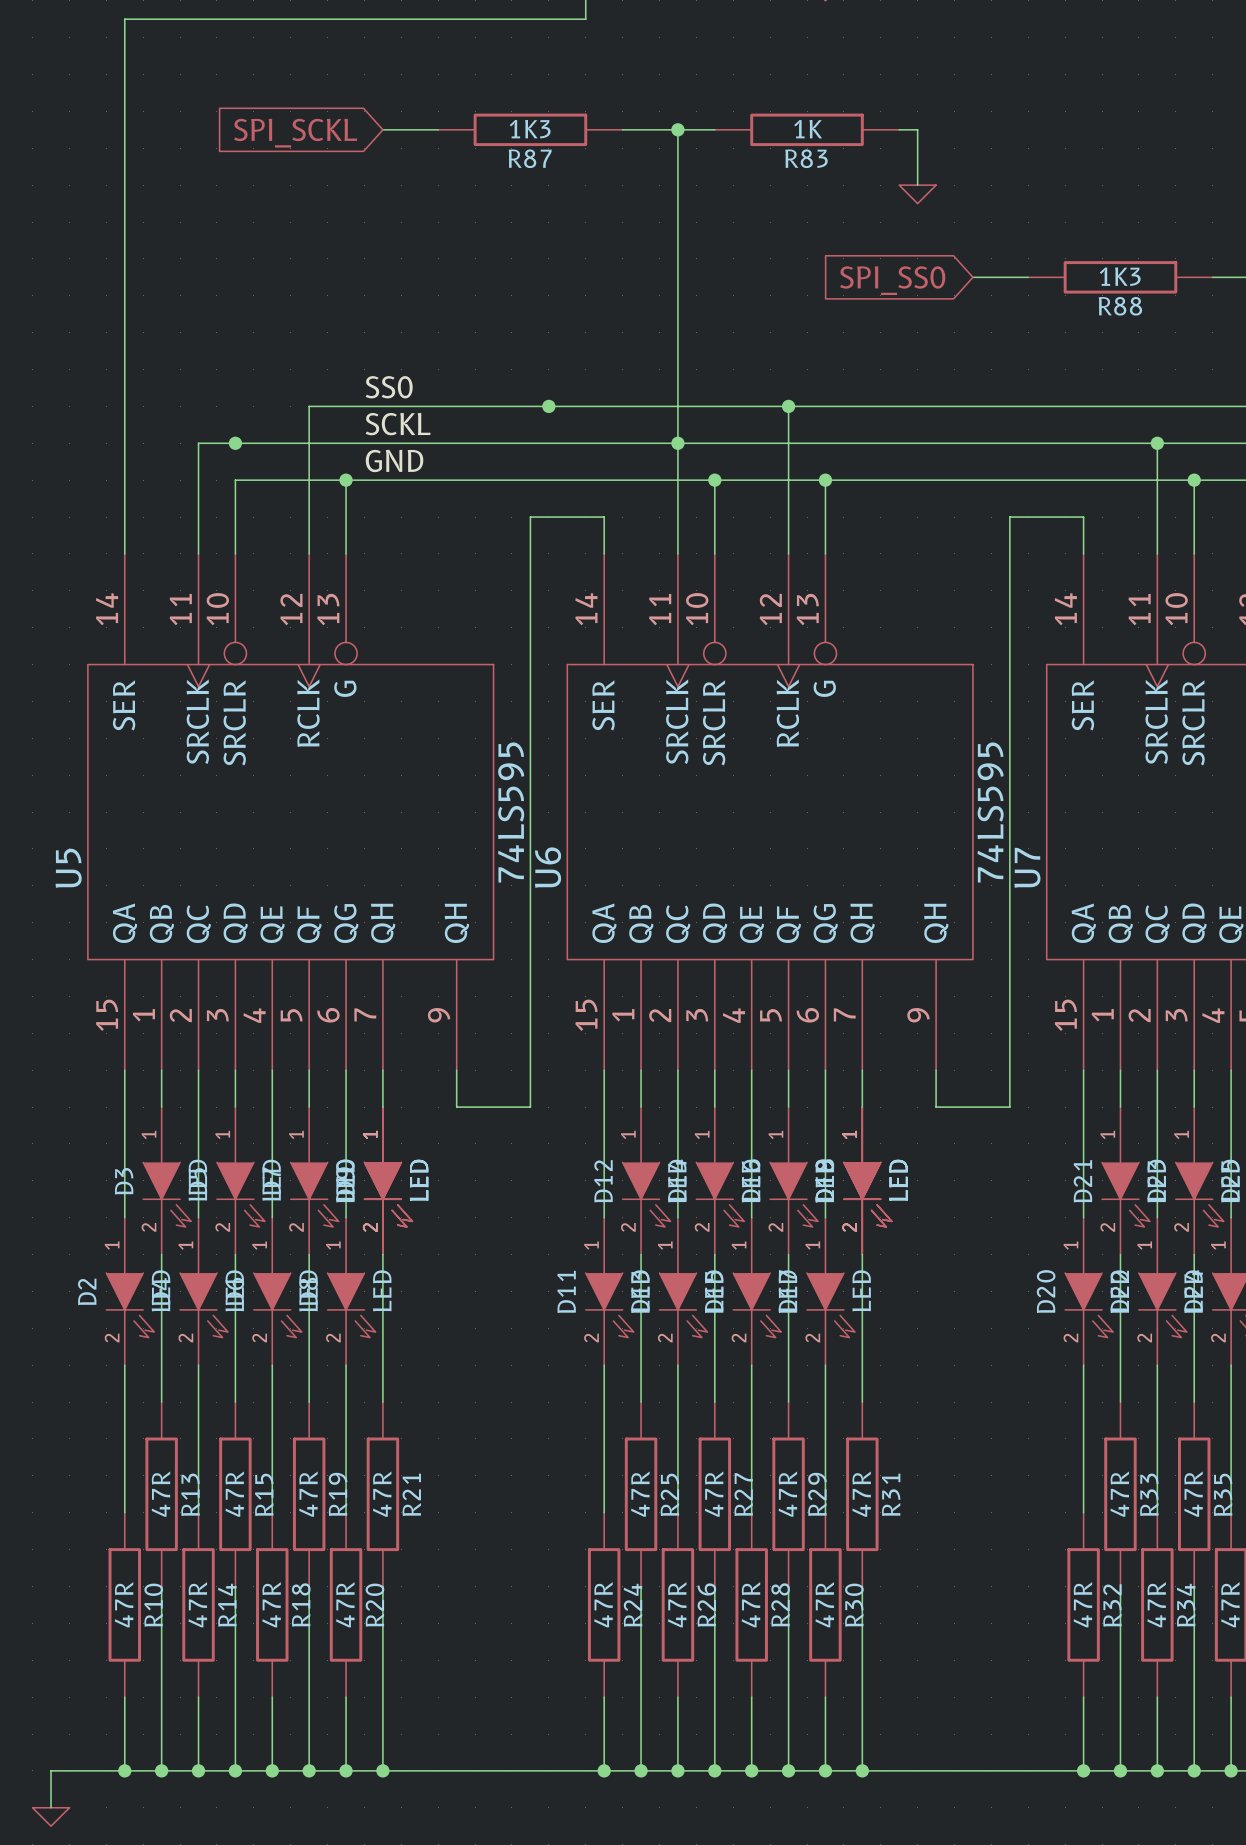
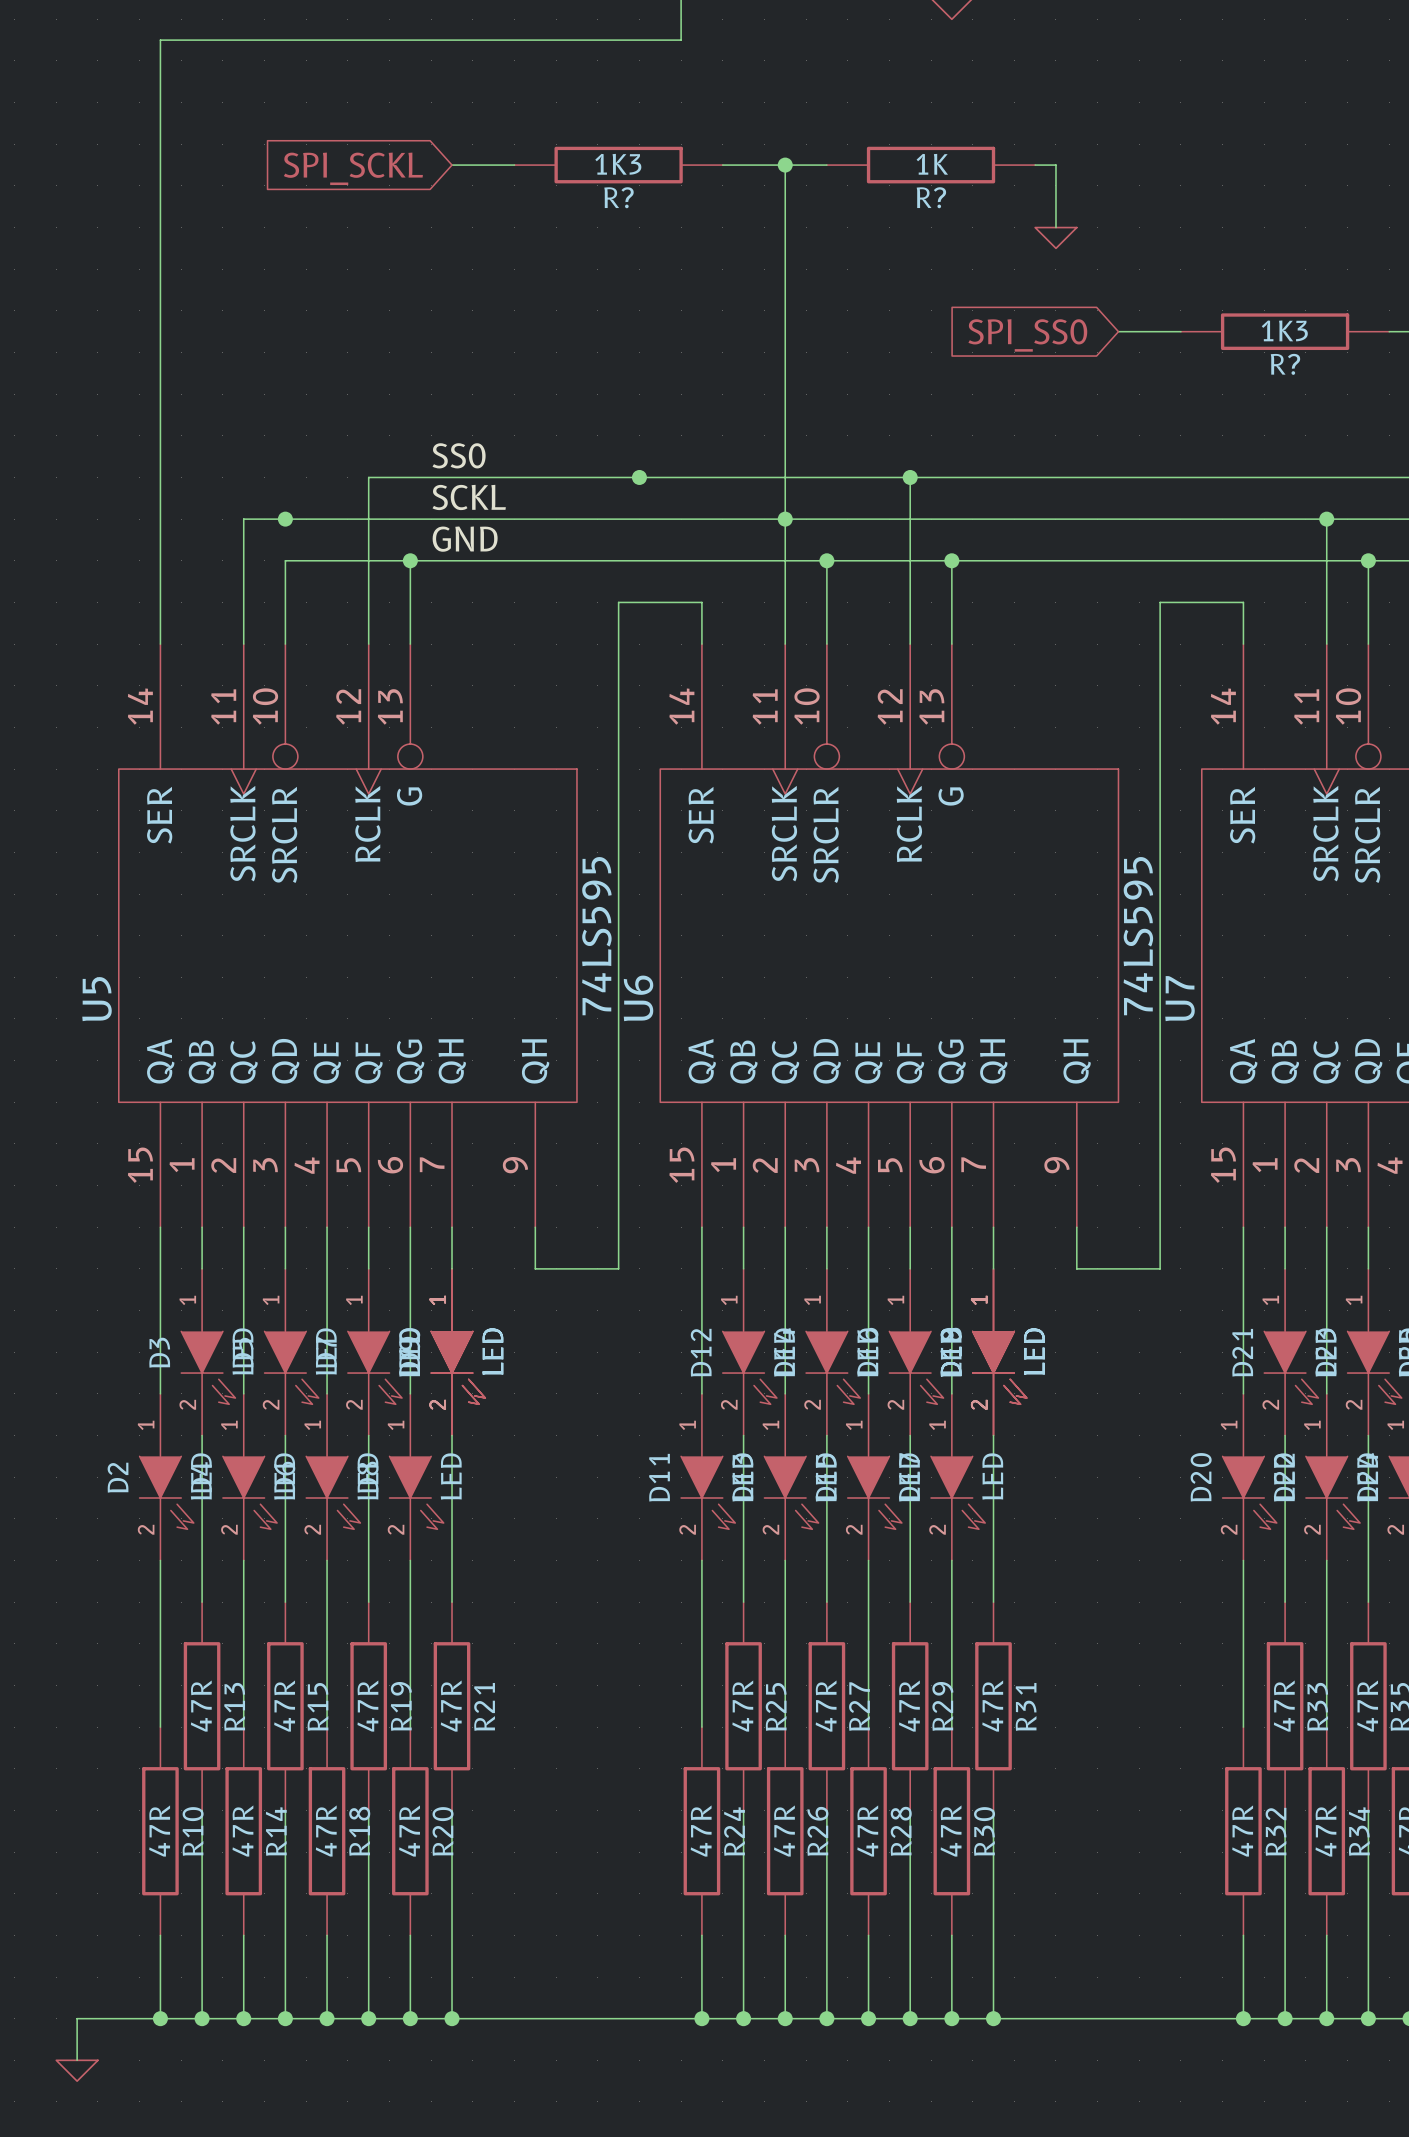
R87 name: R87 (530, 158) -> R? (619, 197)
R83 name: R83 (806, 158) -> R? (931, 197)
R88 name: R88 (1120, 306) -> R? (1285, 364)

